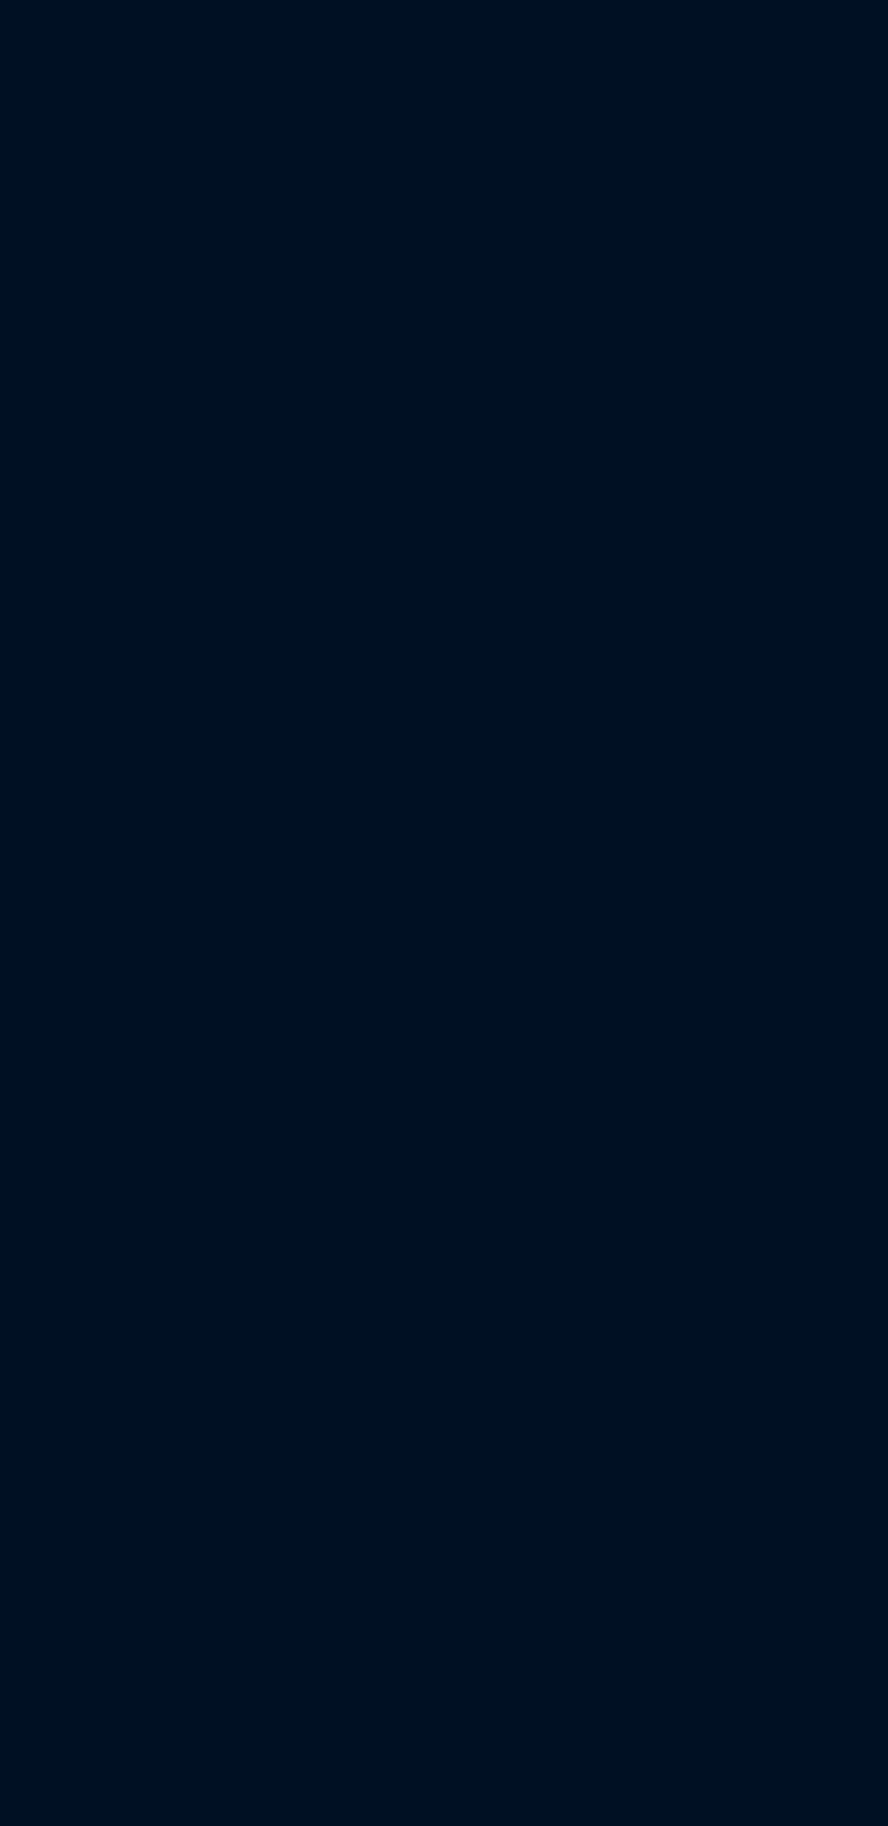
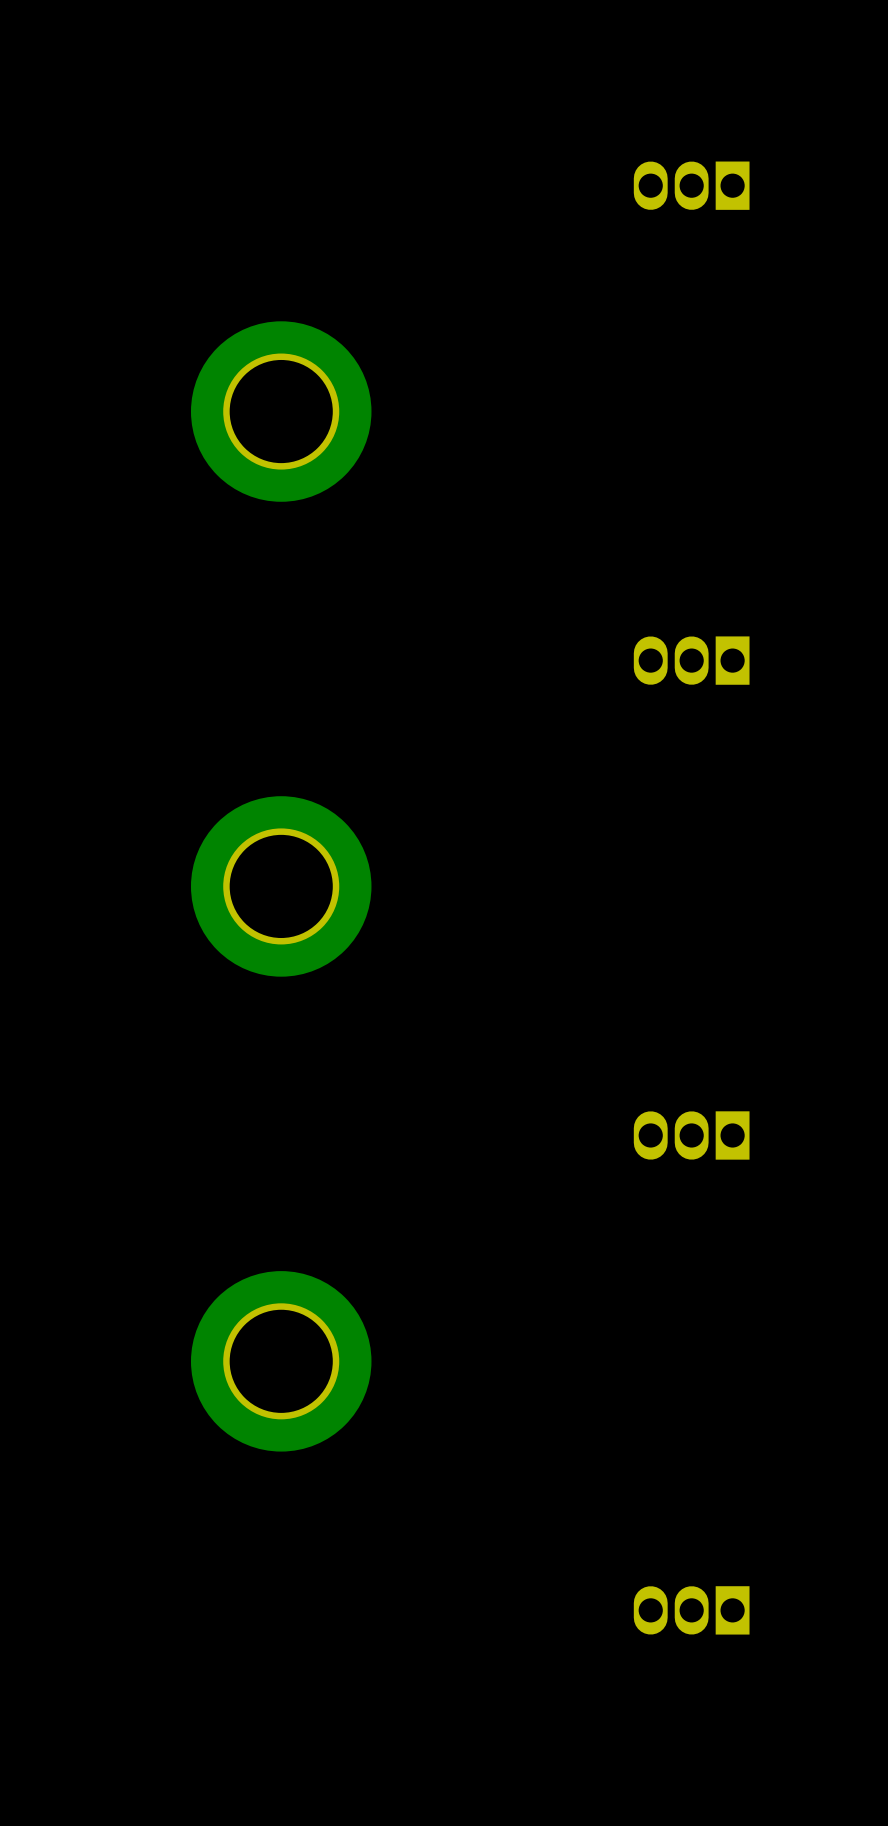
part: none -> (691, 185)
part: none -> (281, 411)
part: none -> (691, 660)
part: none -> (281, 886)
part: none -> (691, 1135)
part: none -> (281, 1361)
part: none -> (691, 1610)

